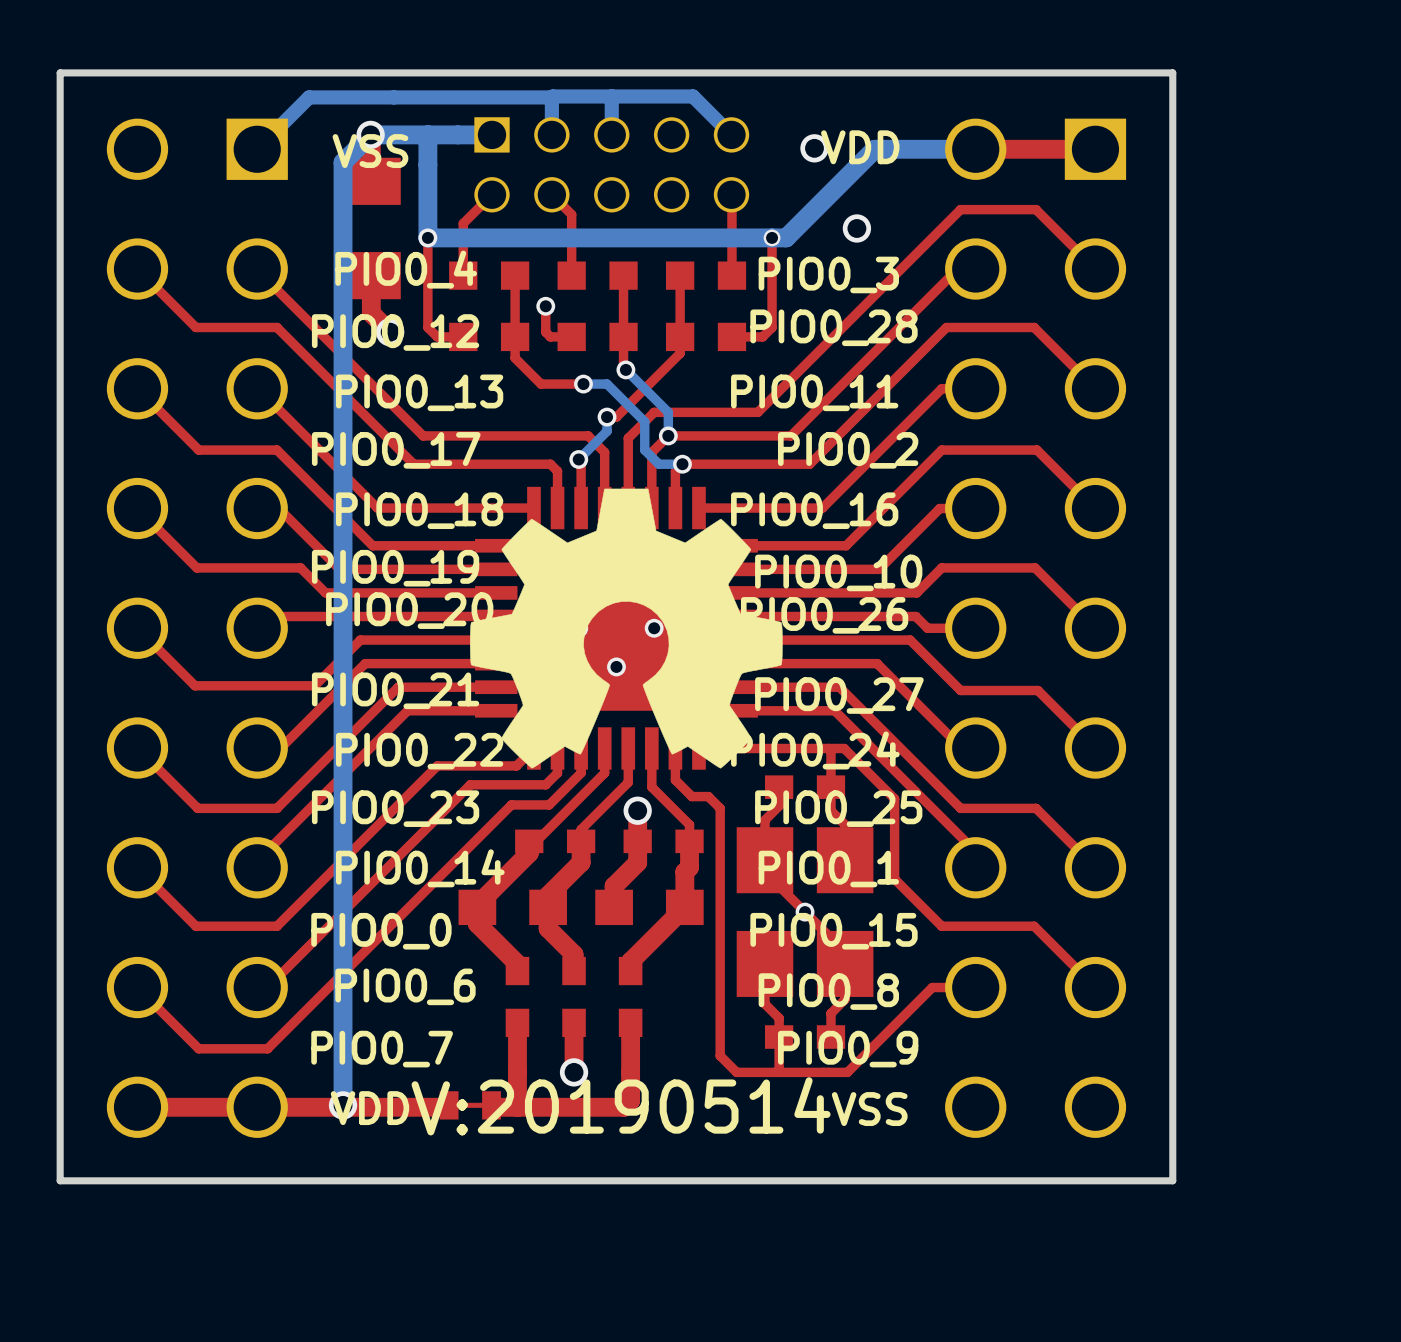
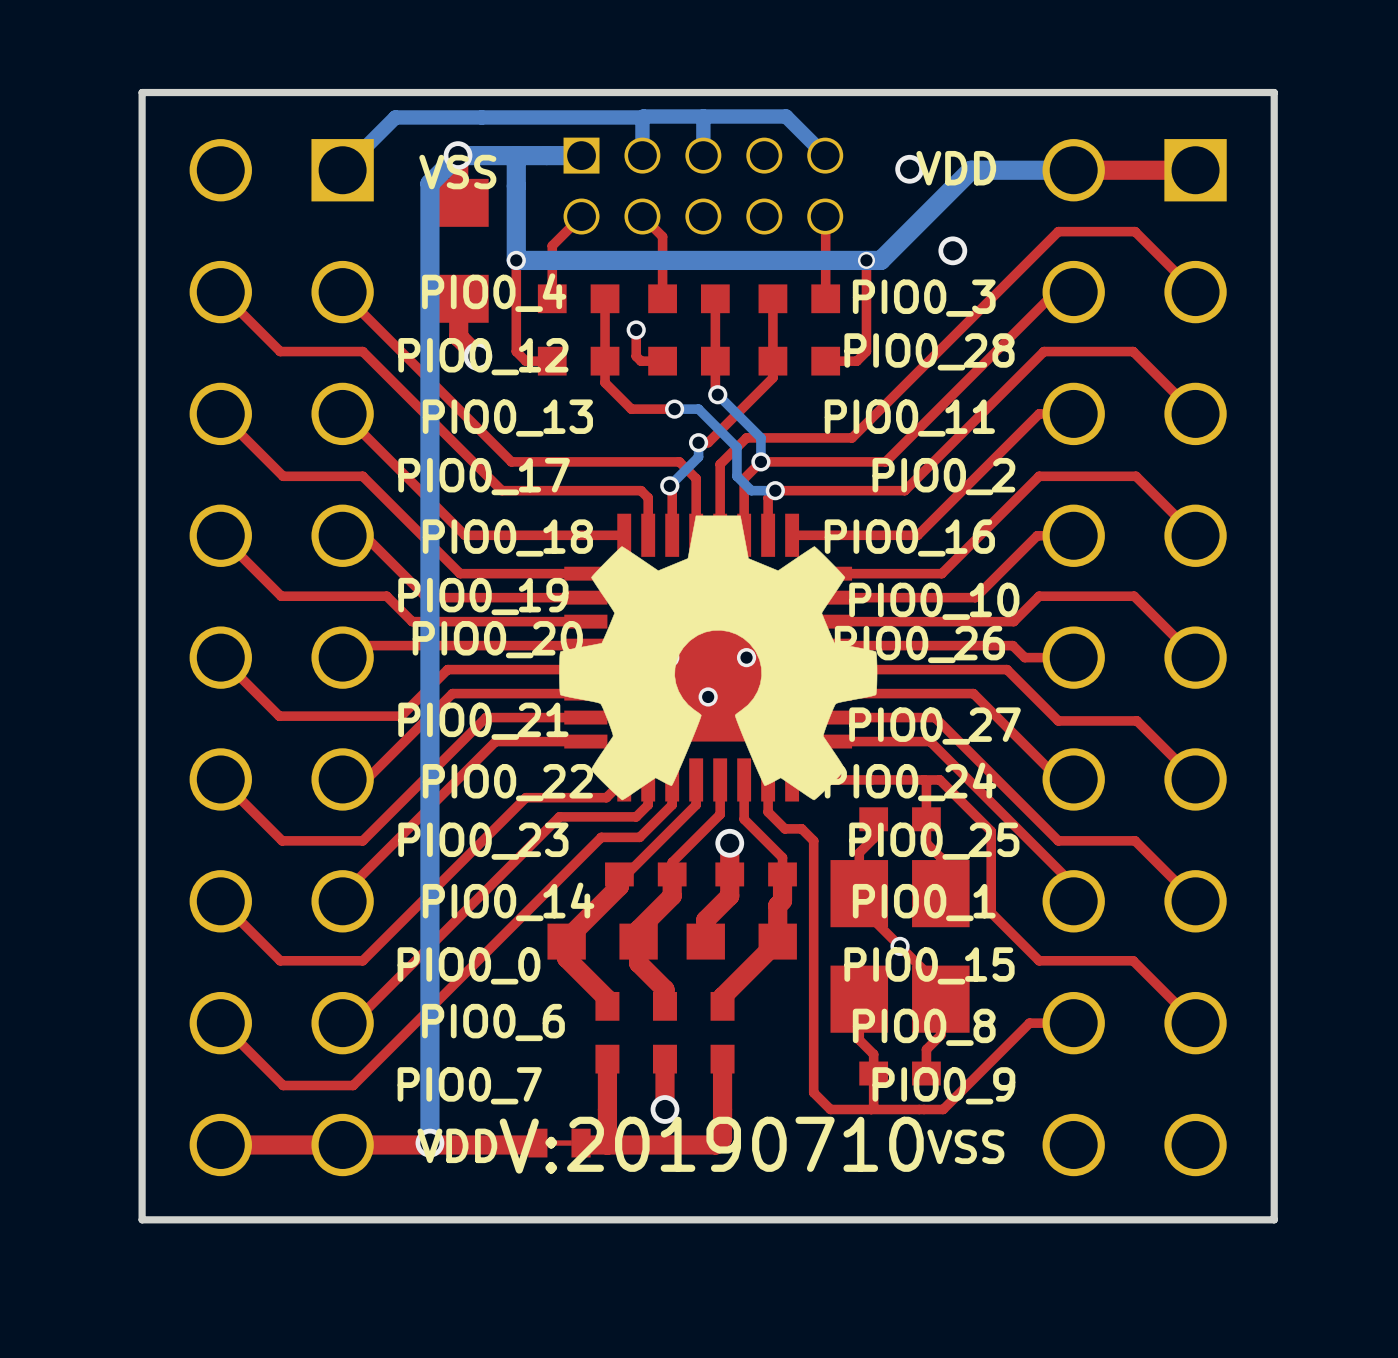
drawing shape: [411, 1077, 831, 1136] -> [499, 1116, 924, 1174]

